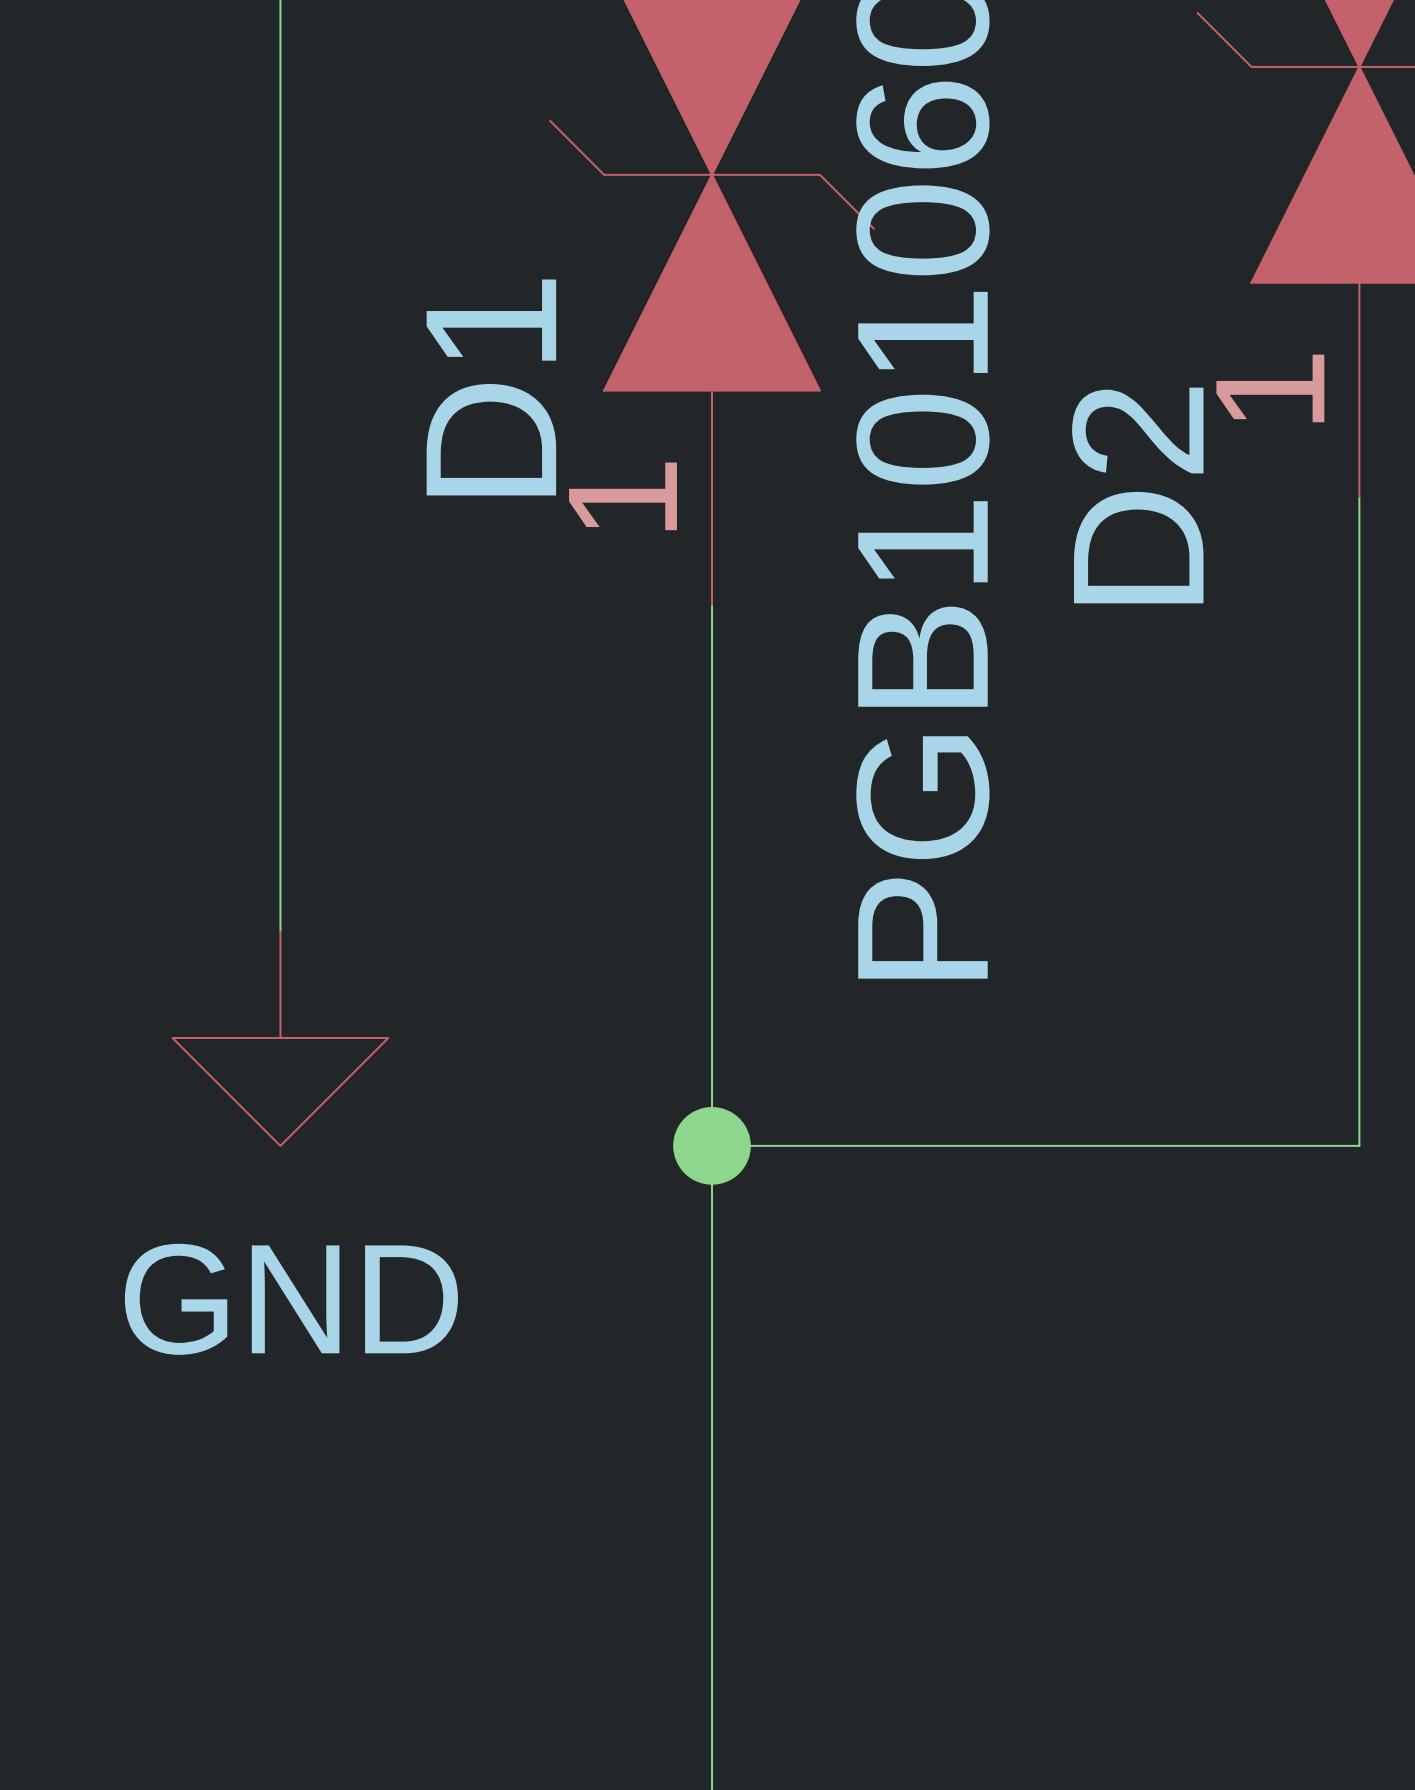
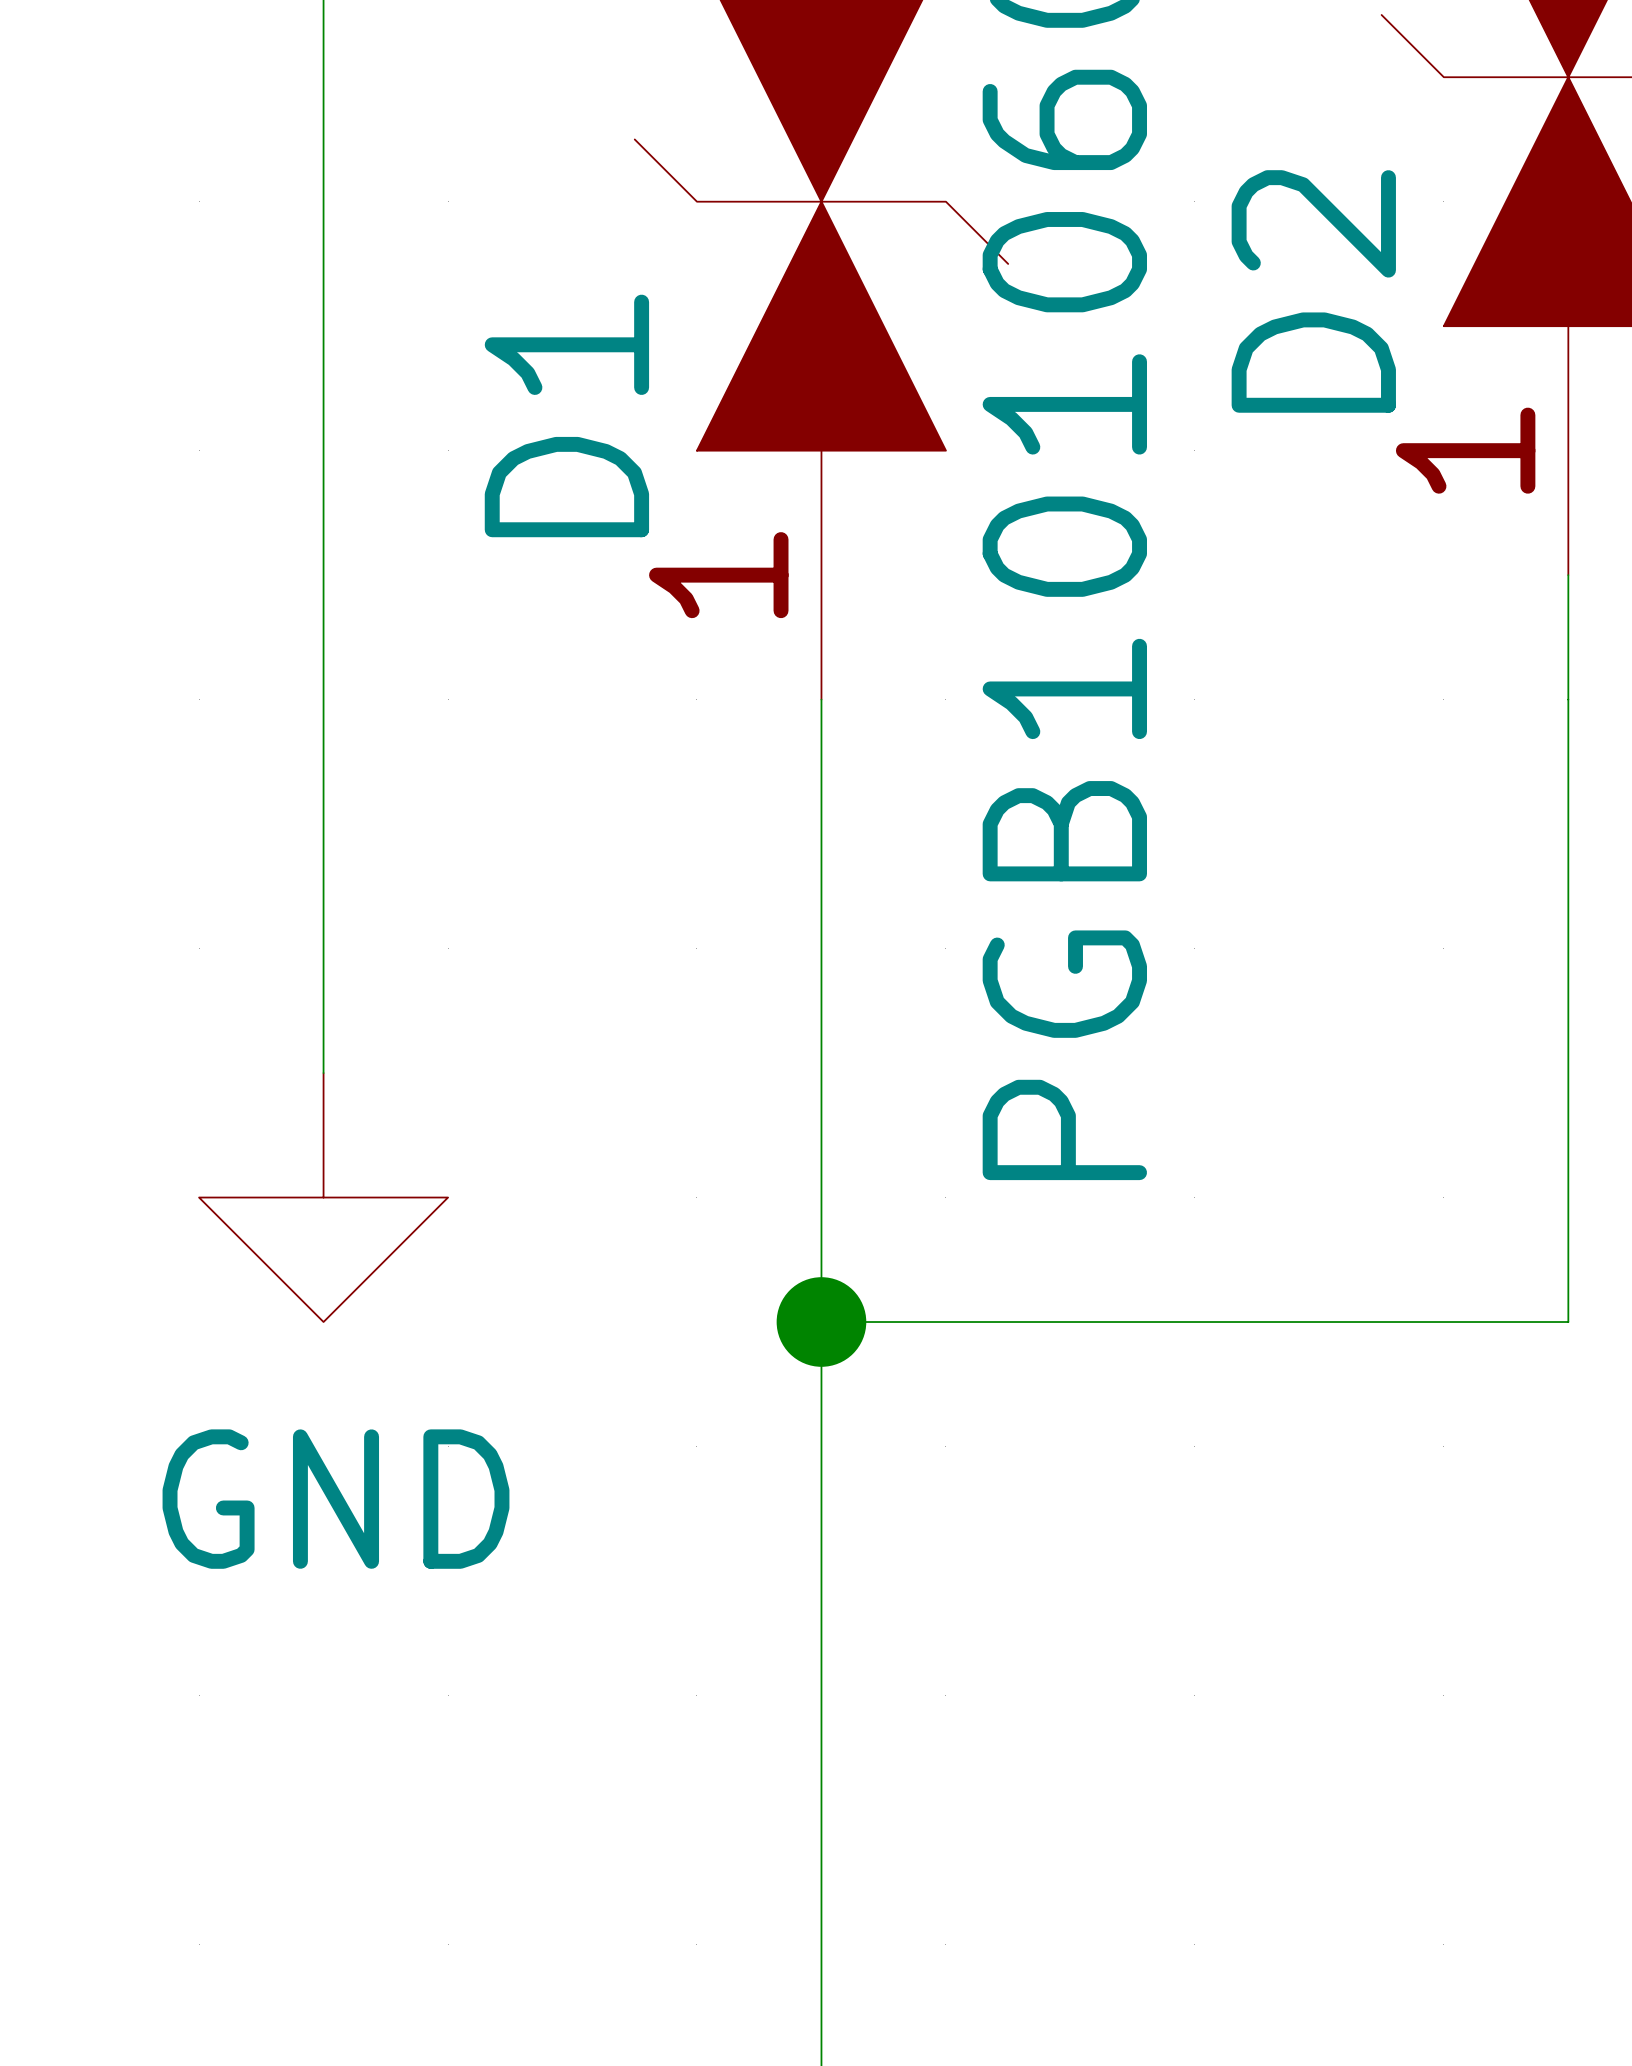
D1 name position: D1 (491, 387) -> D1 (566, 415)
D2 name position: D2 (1137, 495) -> D2 (1313, 291)

